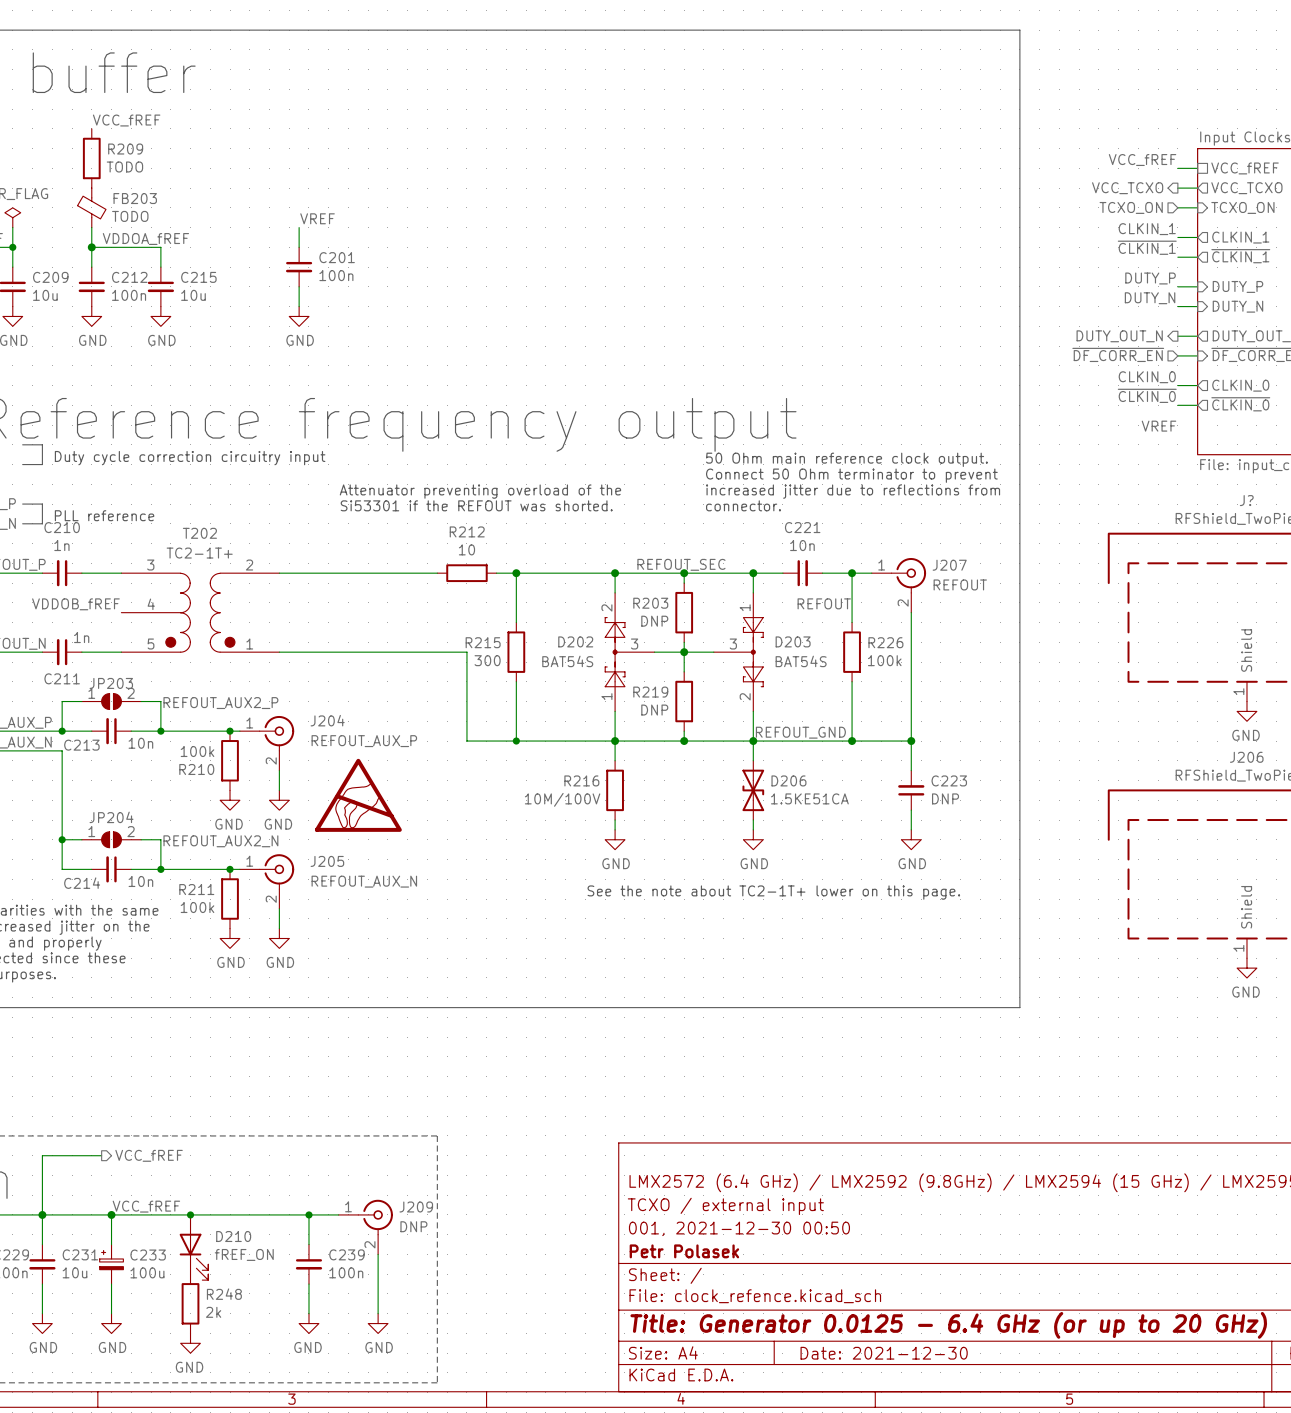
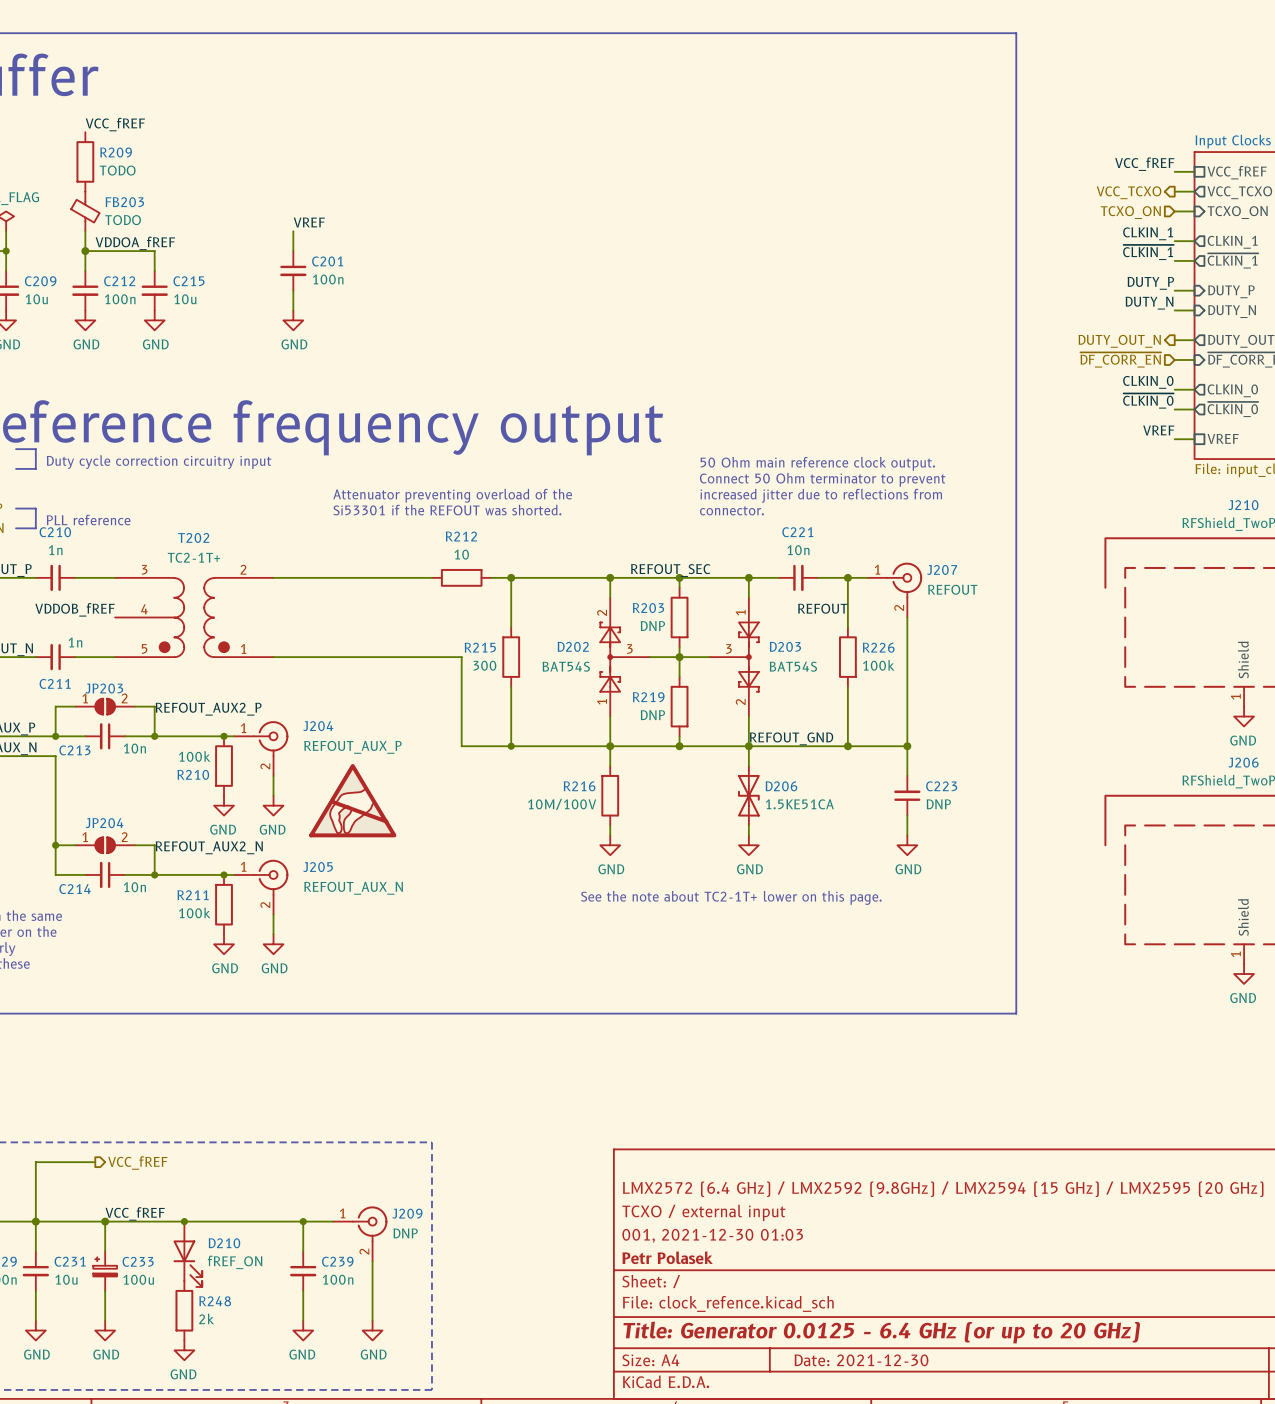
wire: none -> (1174, 439) (1194, 439)
sheet pin: none -> VREF (1223, 438)
J? name: J? (1246, 500) -> J210 (1243, 505)
title block: 001, 2021-12-30 00:50 (739, 1228) -> 001, 2021-12-30 01:03 (712, 1235)

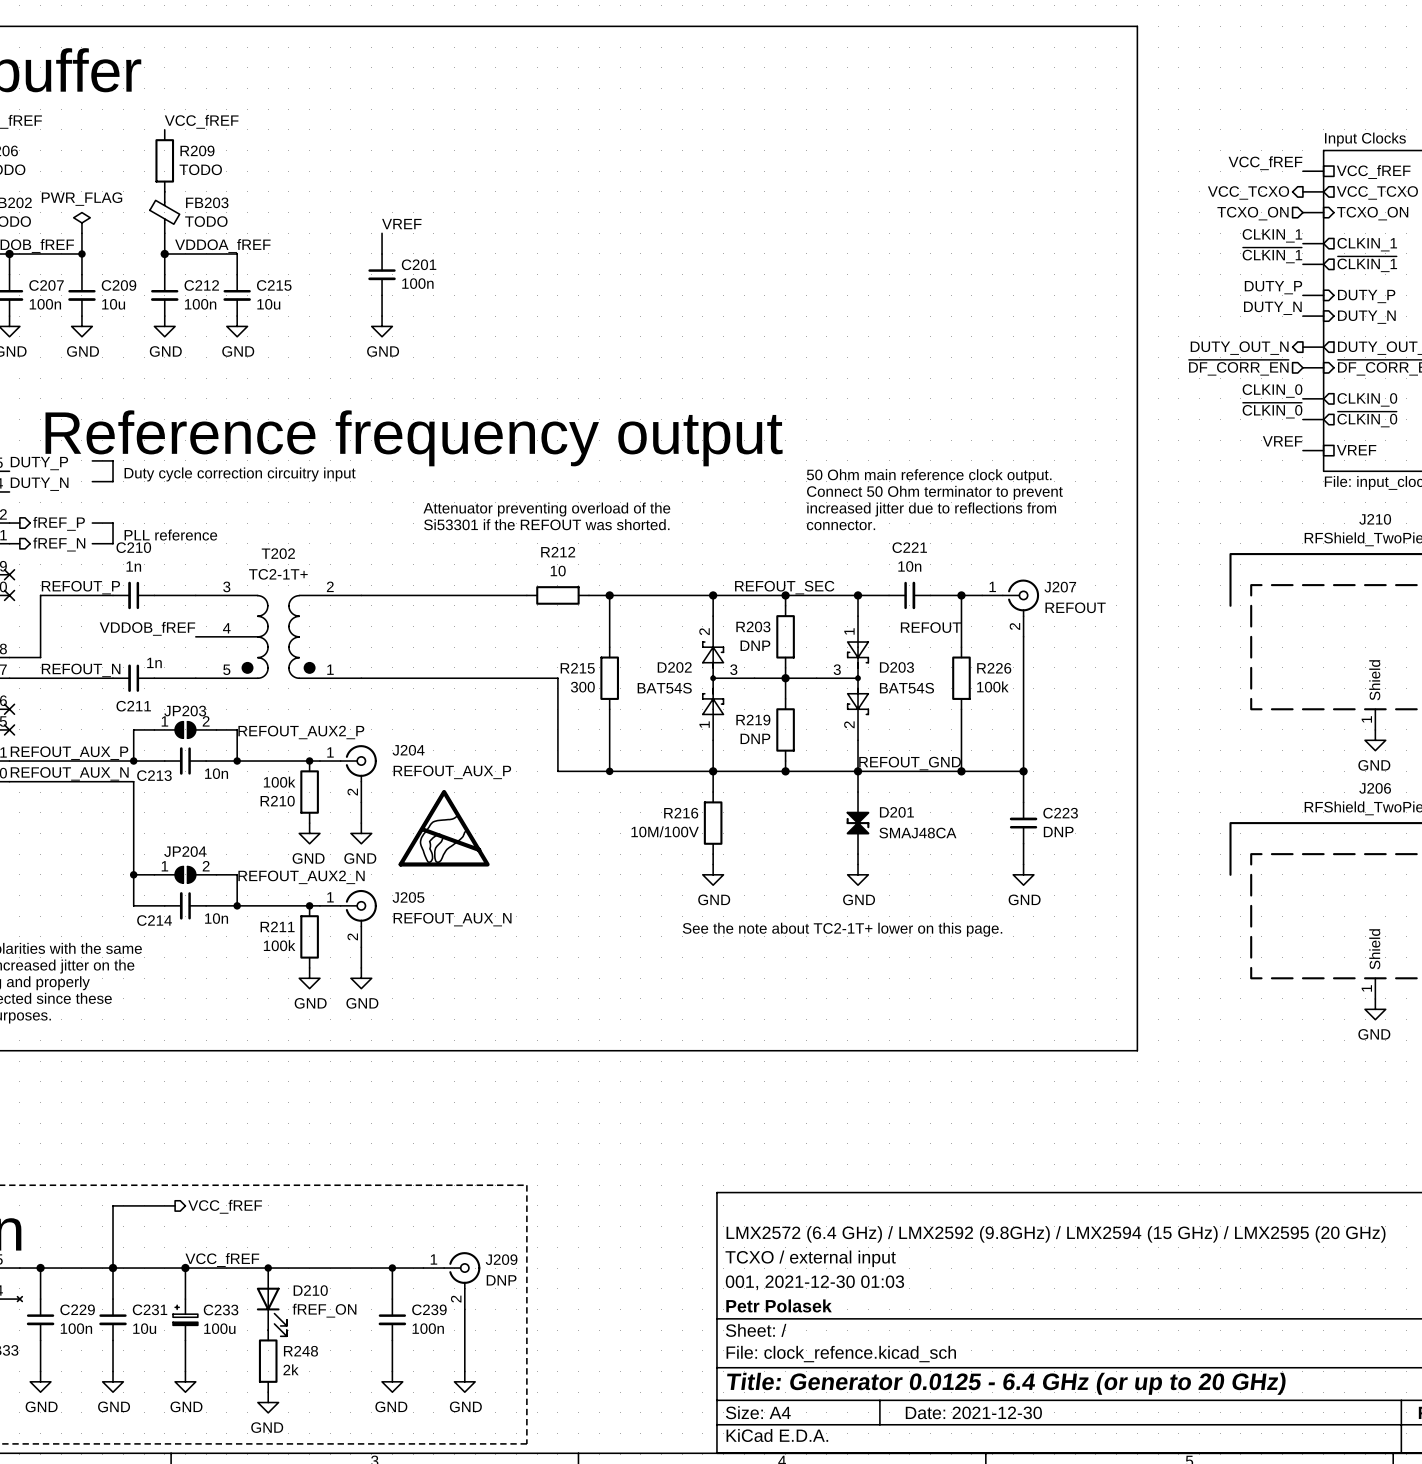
D206: 1.5KE51CA (748, 795) -> none
D201: none -> SMAJ48CA (858, 823)

